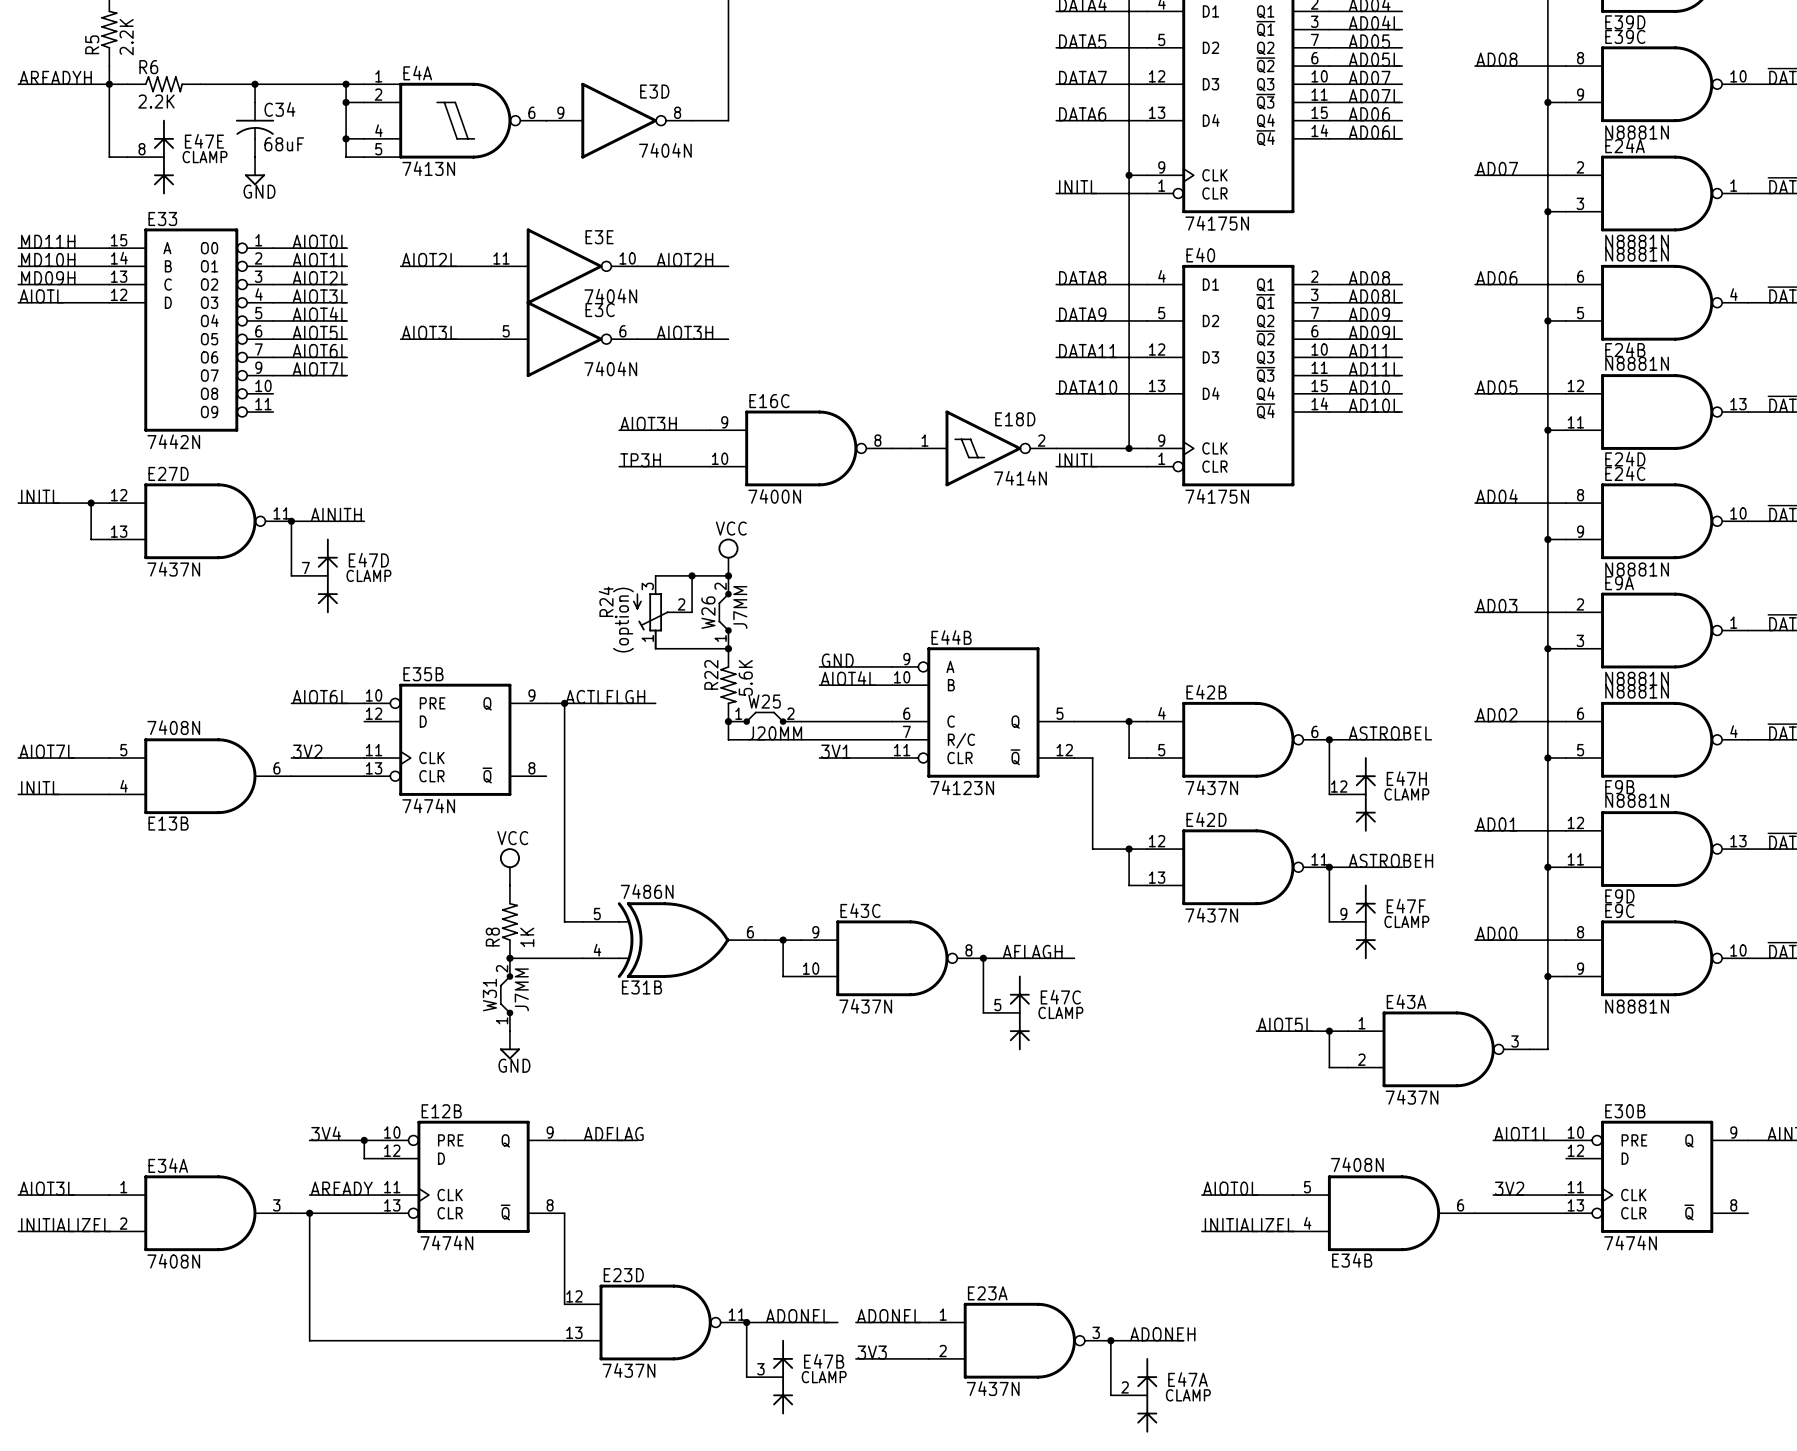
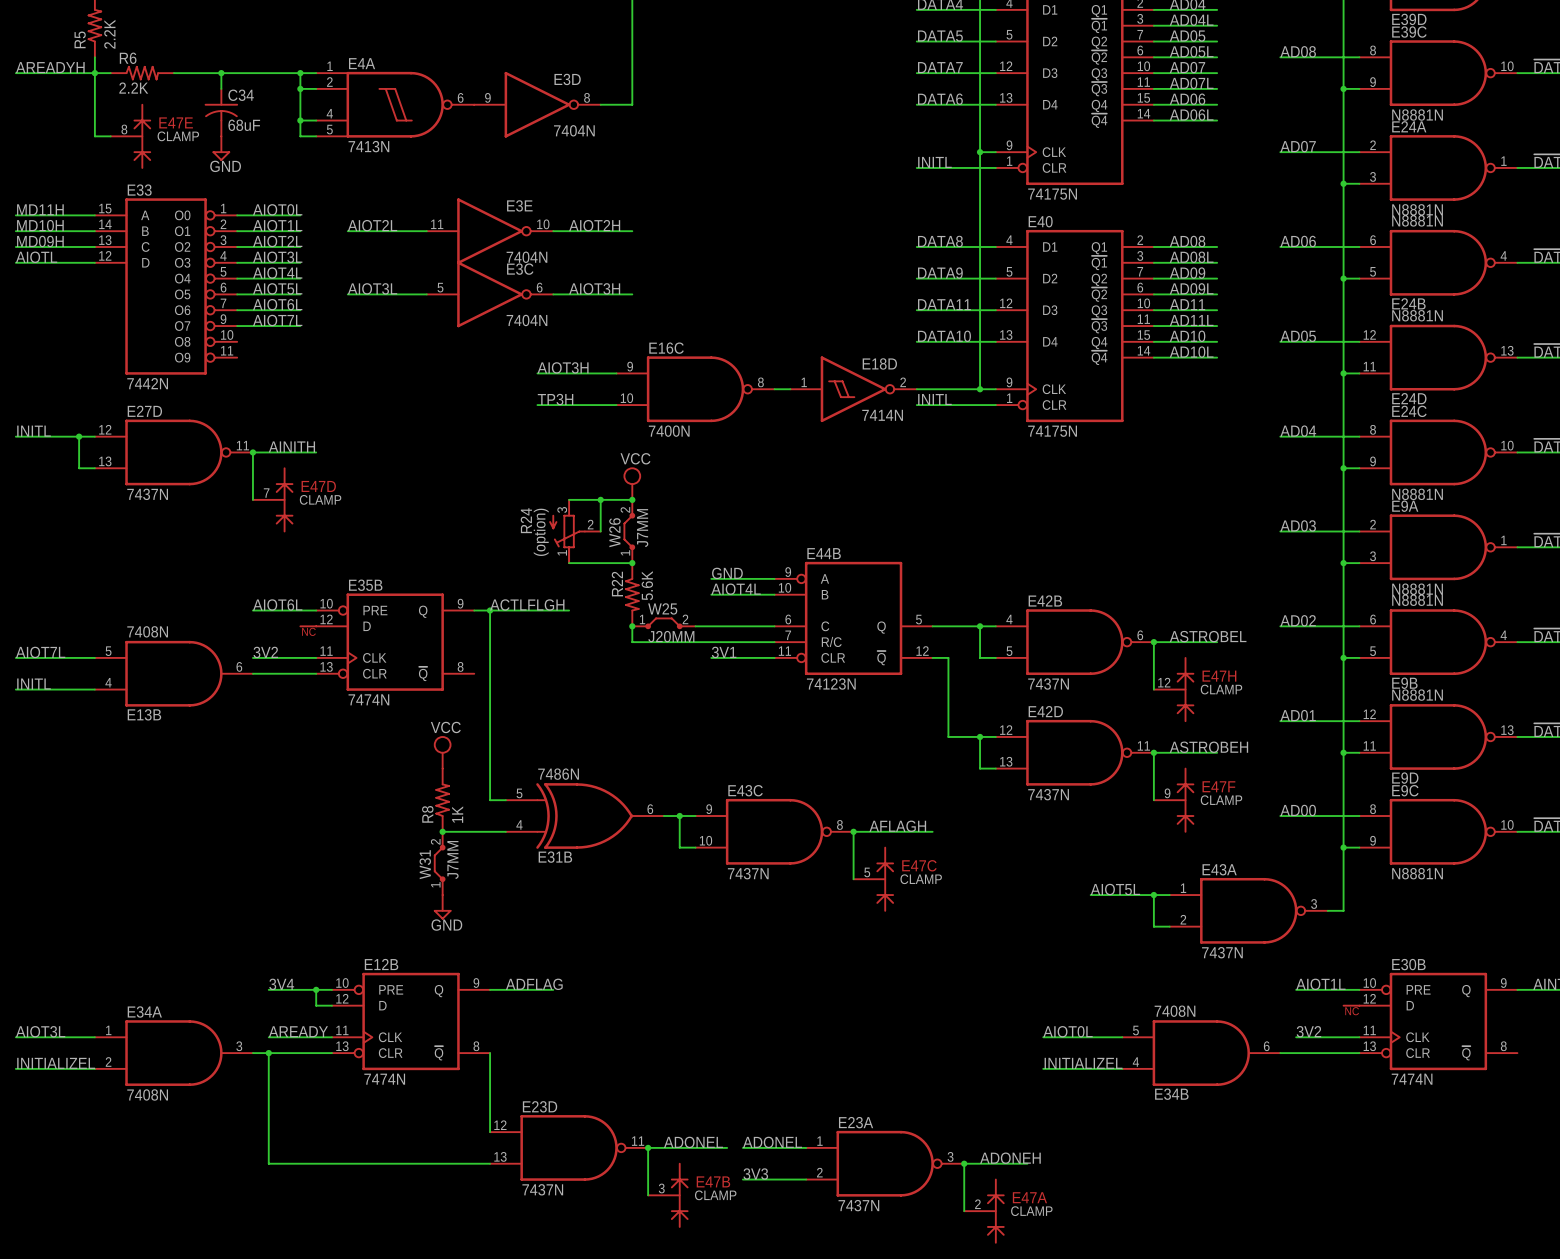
power symbol: none -> (308, 626)
power symbol: none -> (1351, 1005)

